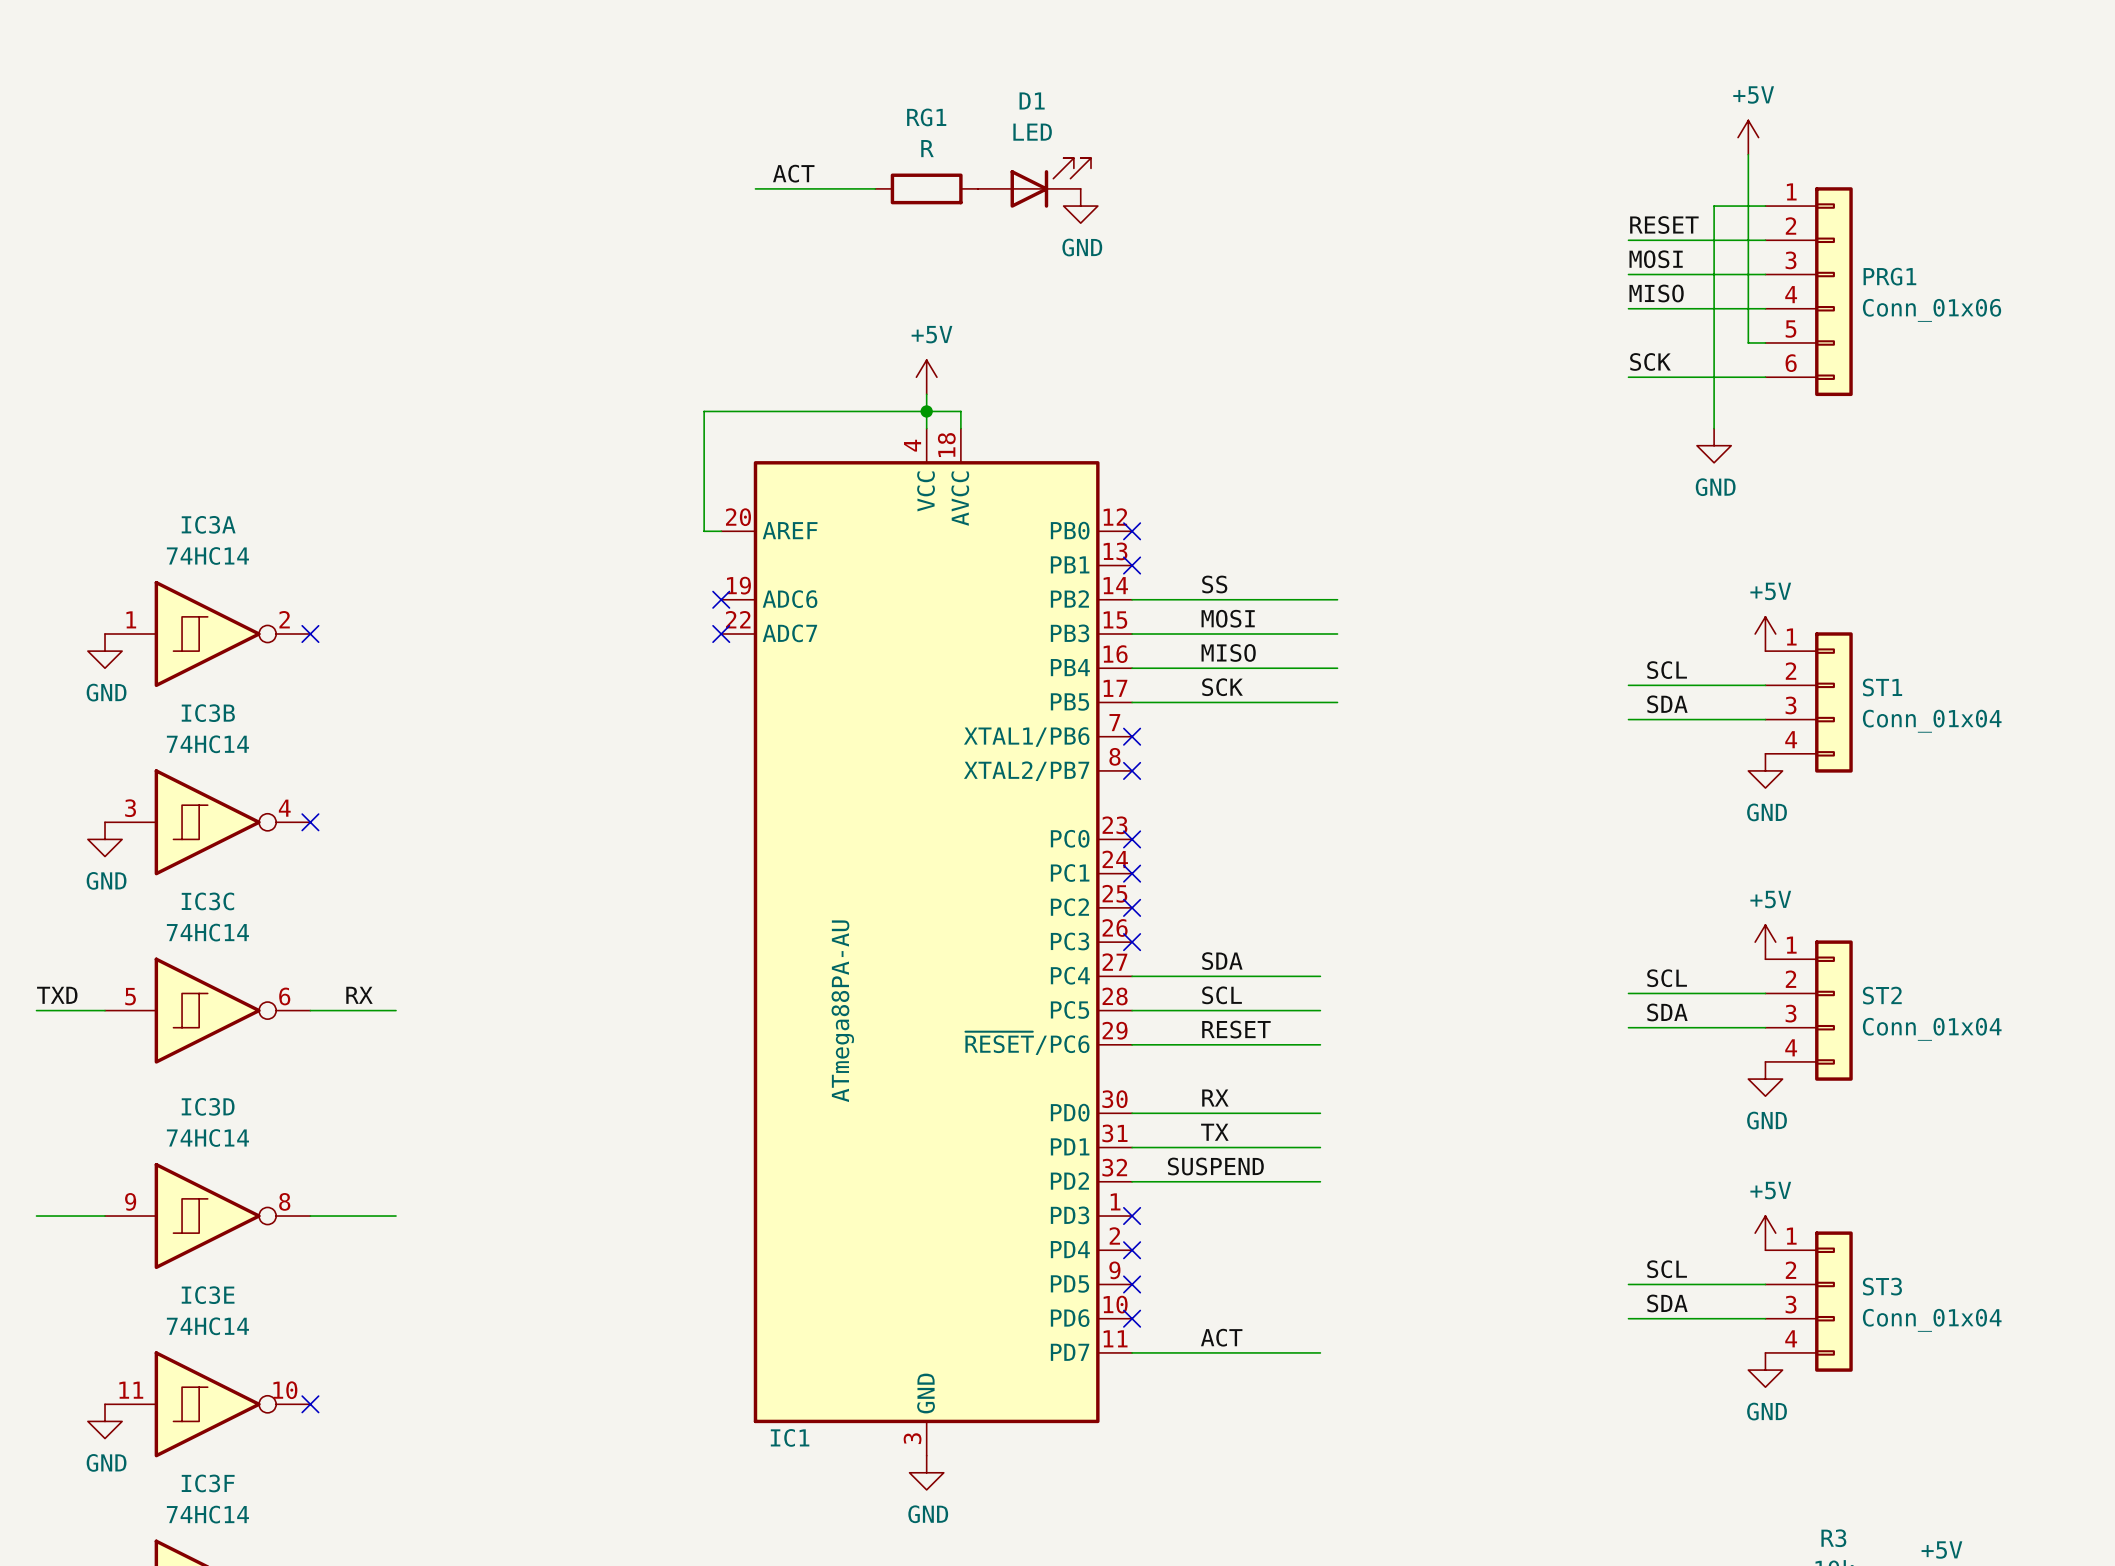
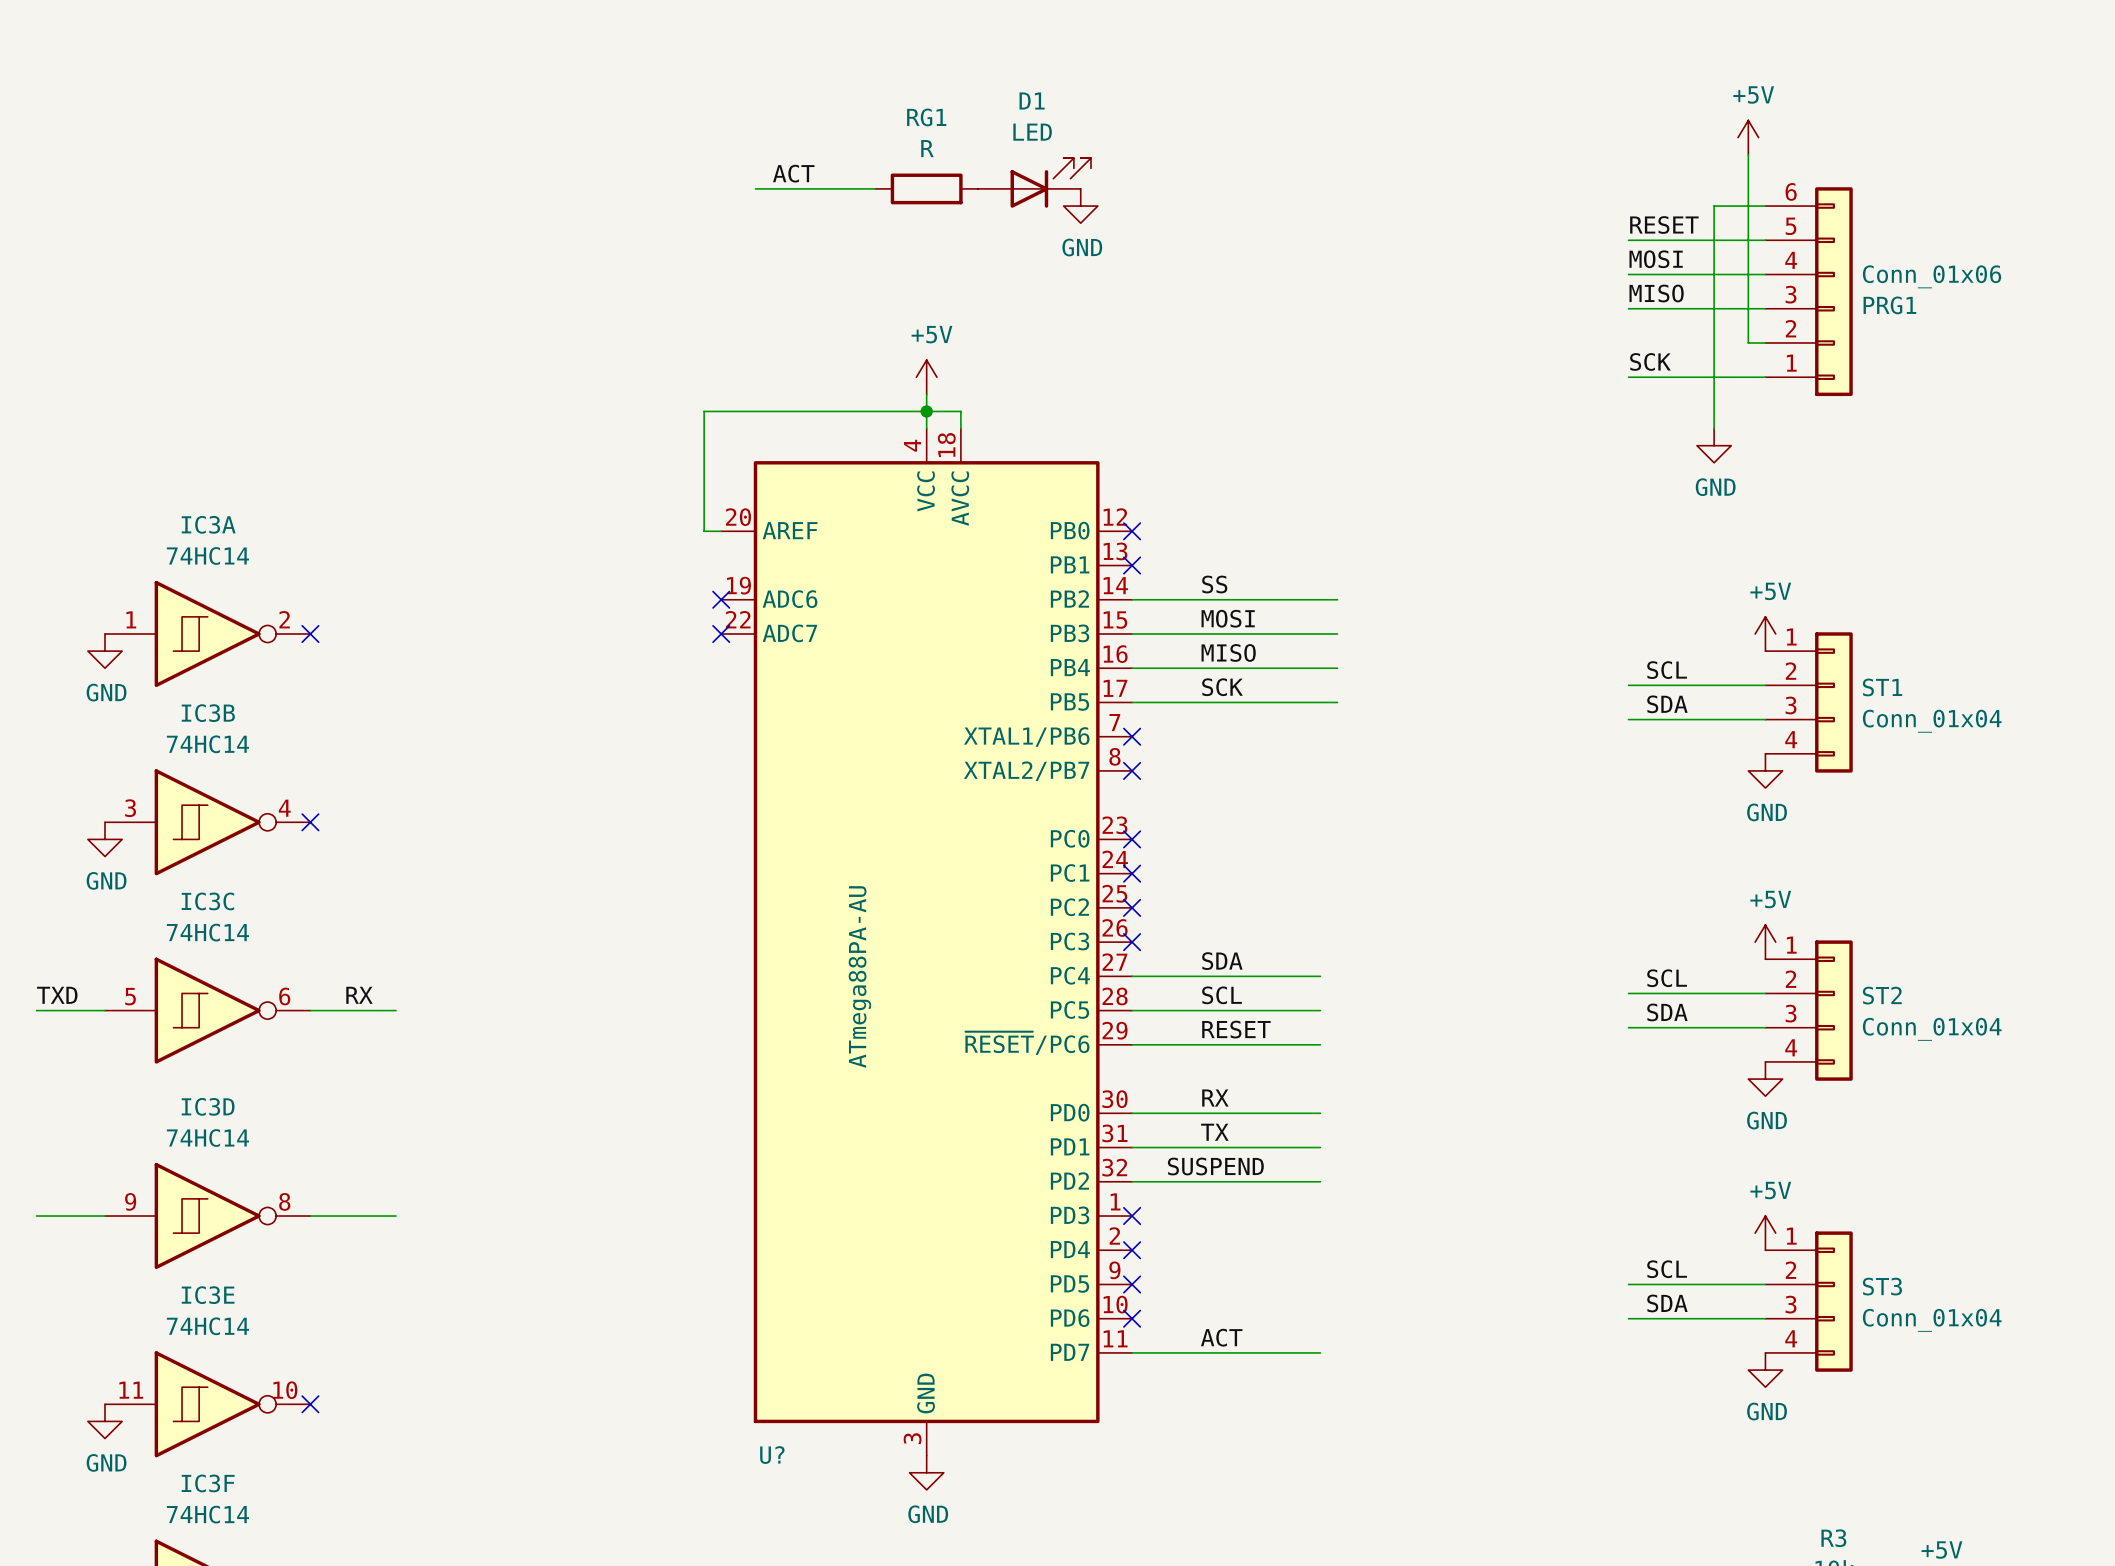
PRG1 flip: as is (1833, 291) -> up-down (1833, 291)
IC1 value position: ATmega88PA-AU (842, 1011) -> ATmega88PA-AU (859, 976)
IC1 name: IC1 (790, 1437) -> U? (772, 1455)

